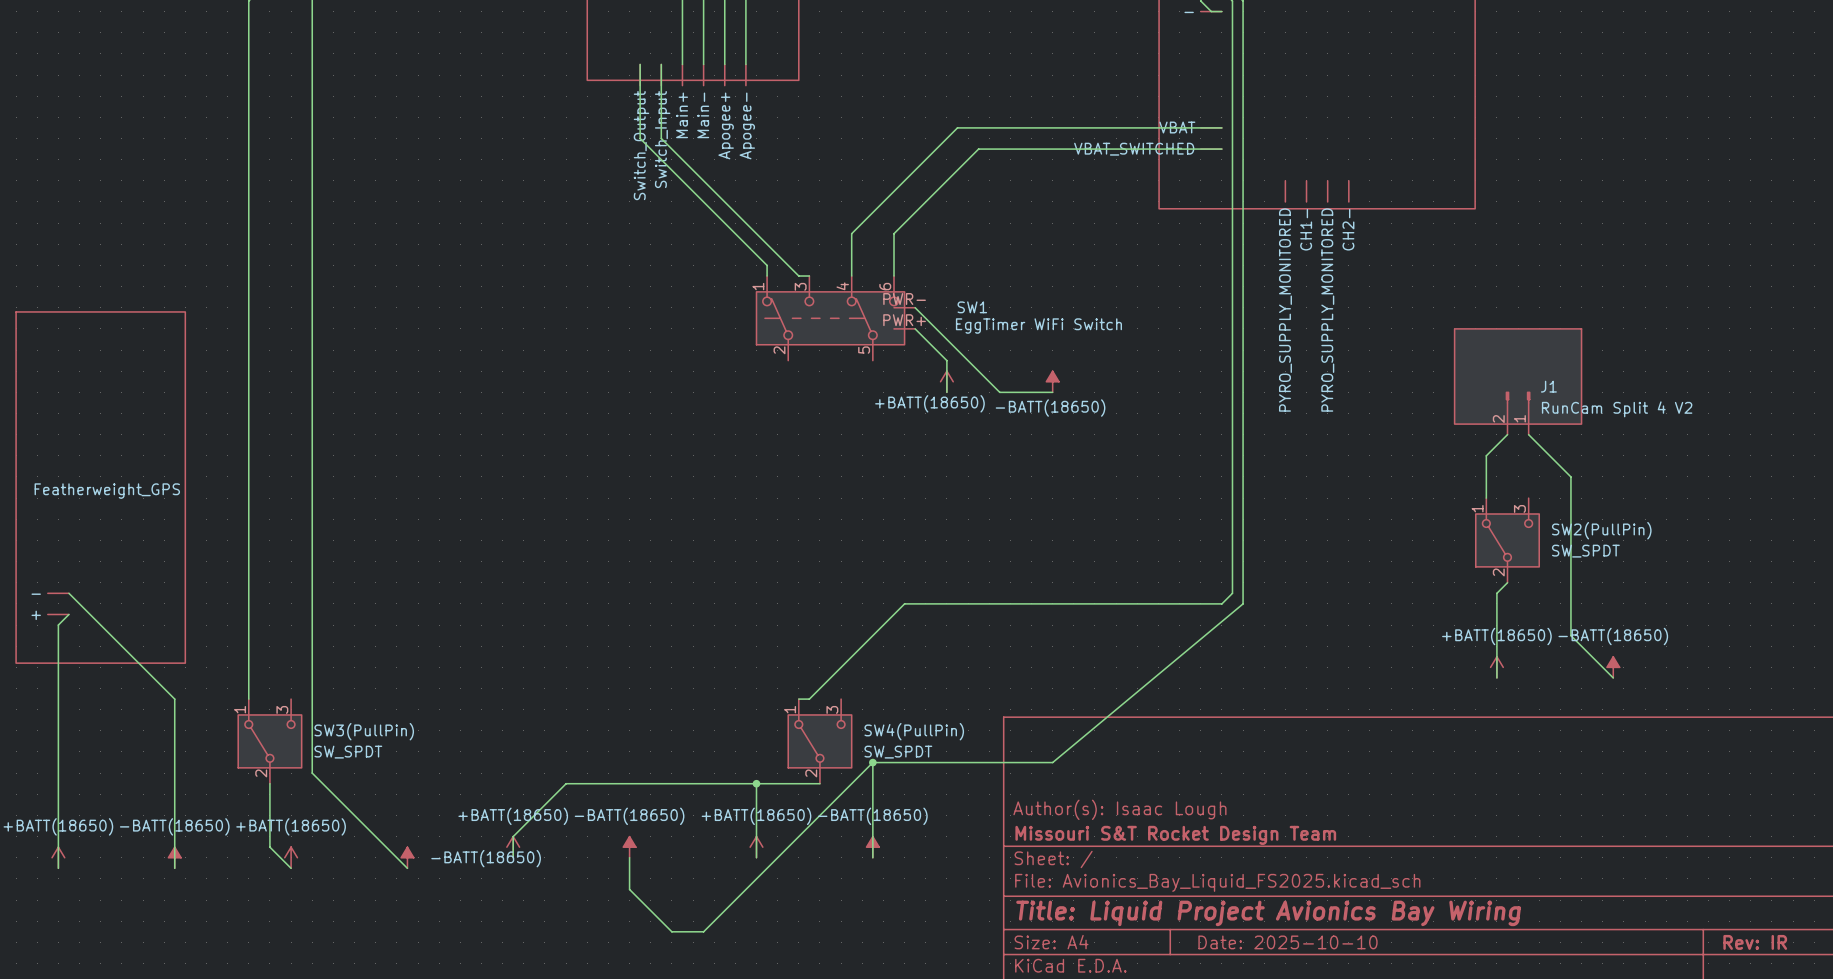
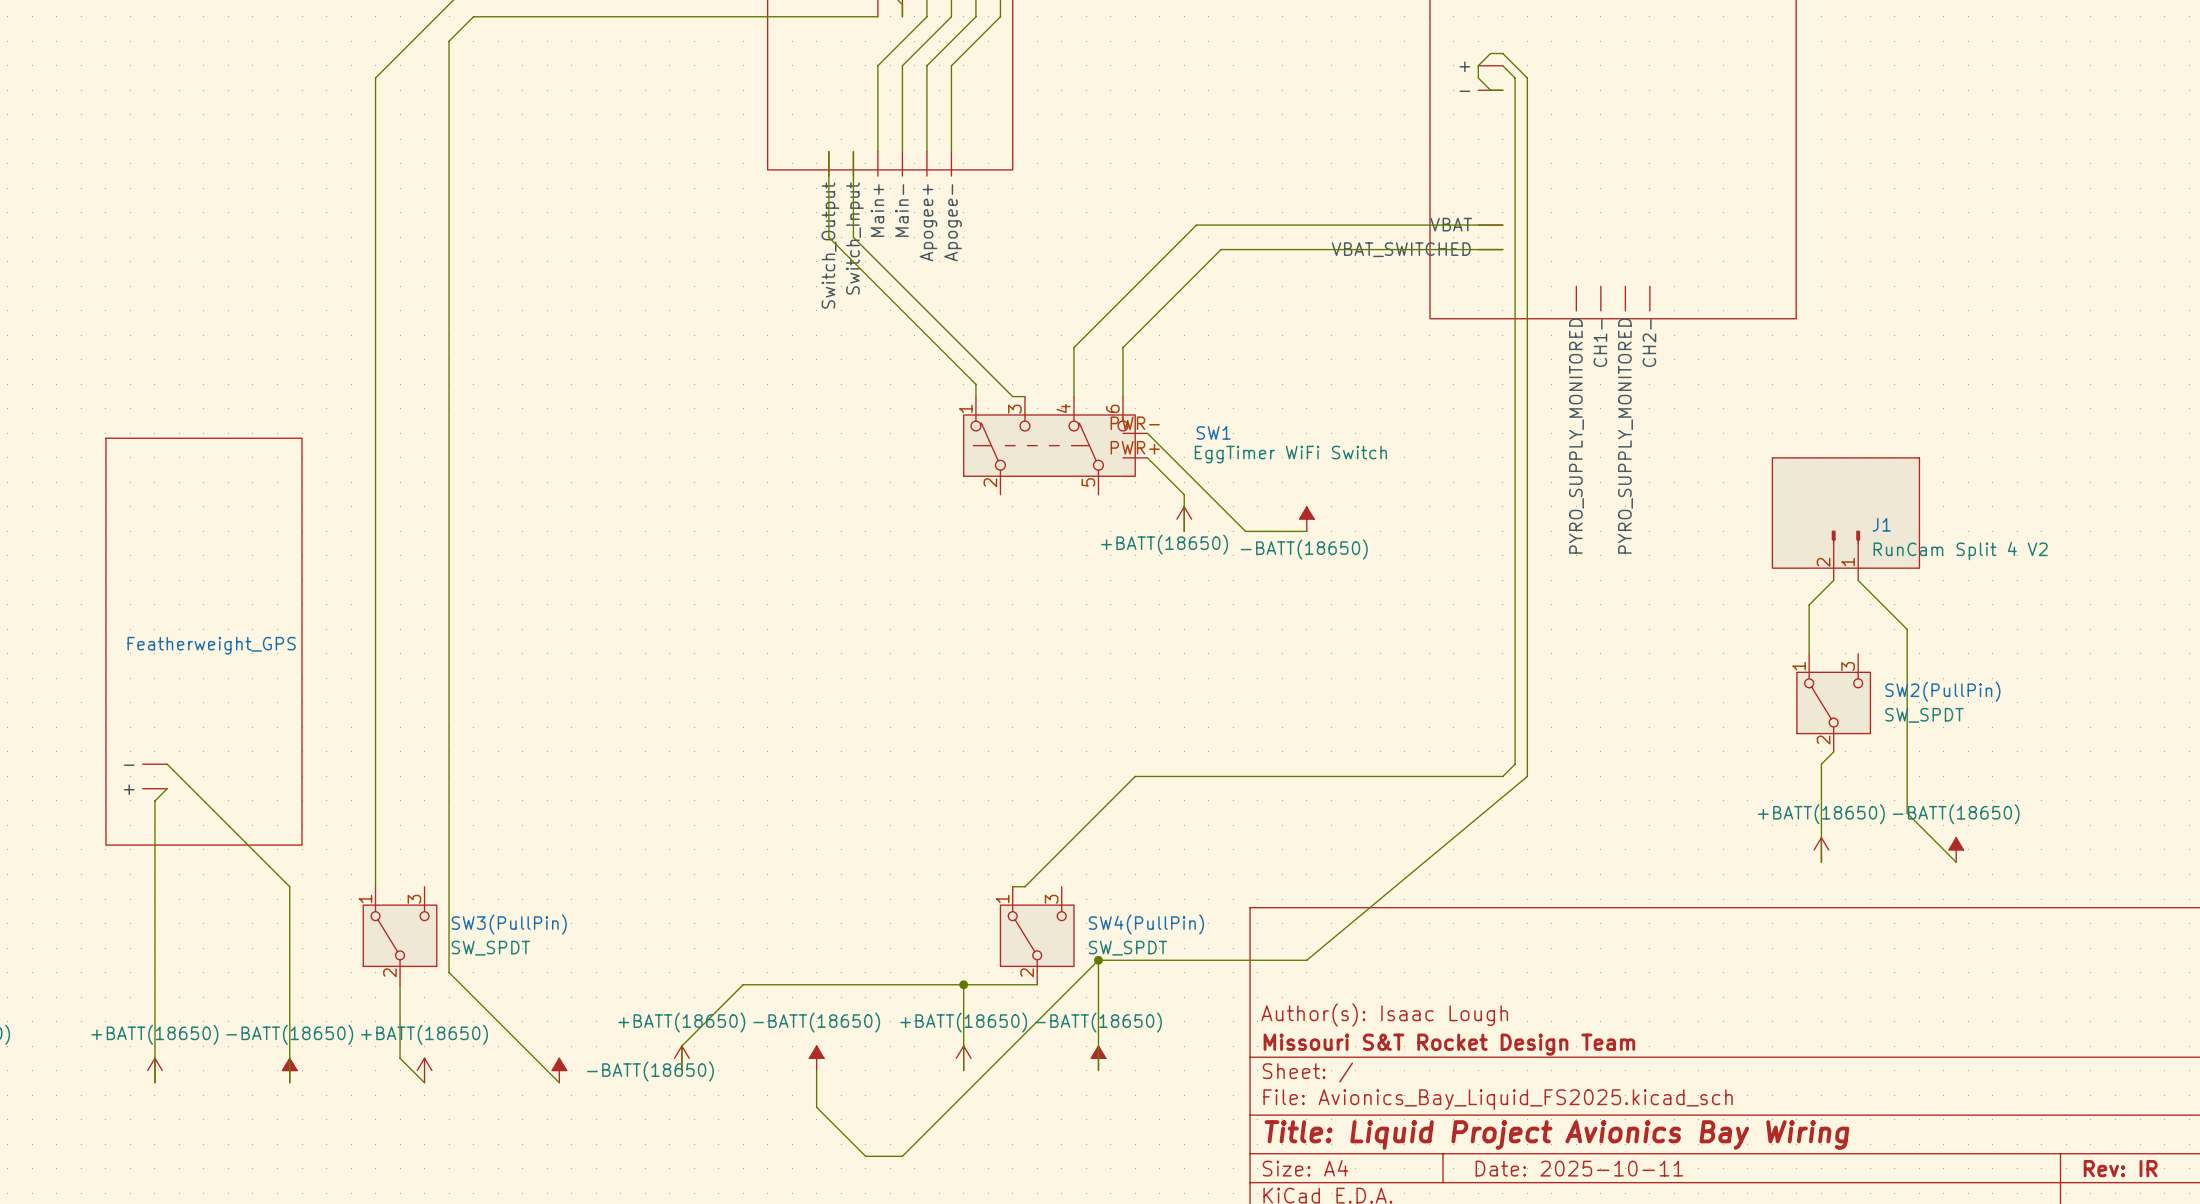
title block: Date: 2025-10-10 (1288, 942) -> Date: 2025-10-11 (1579, 1168)

